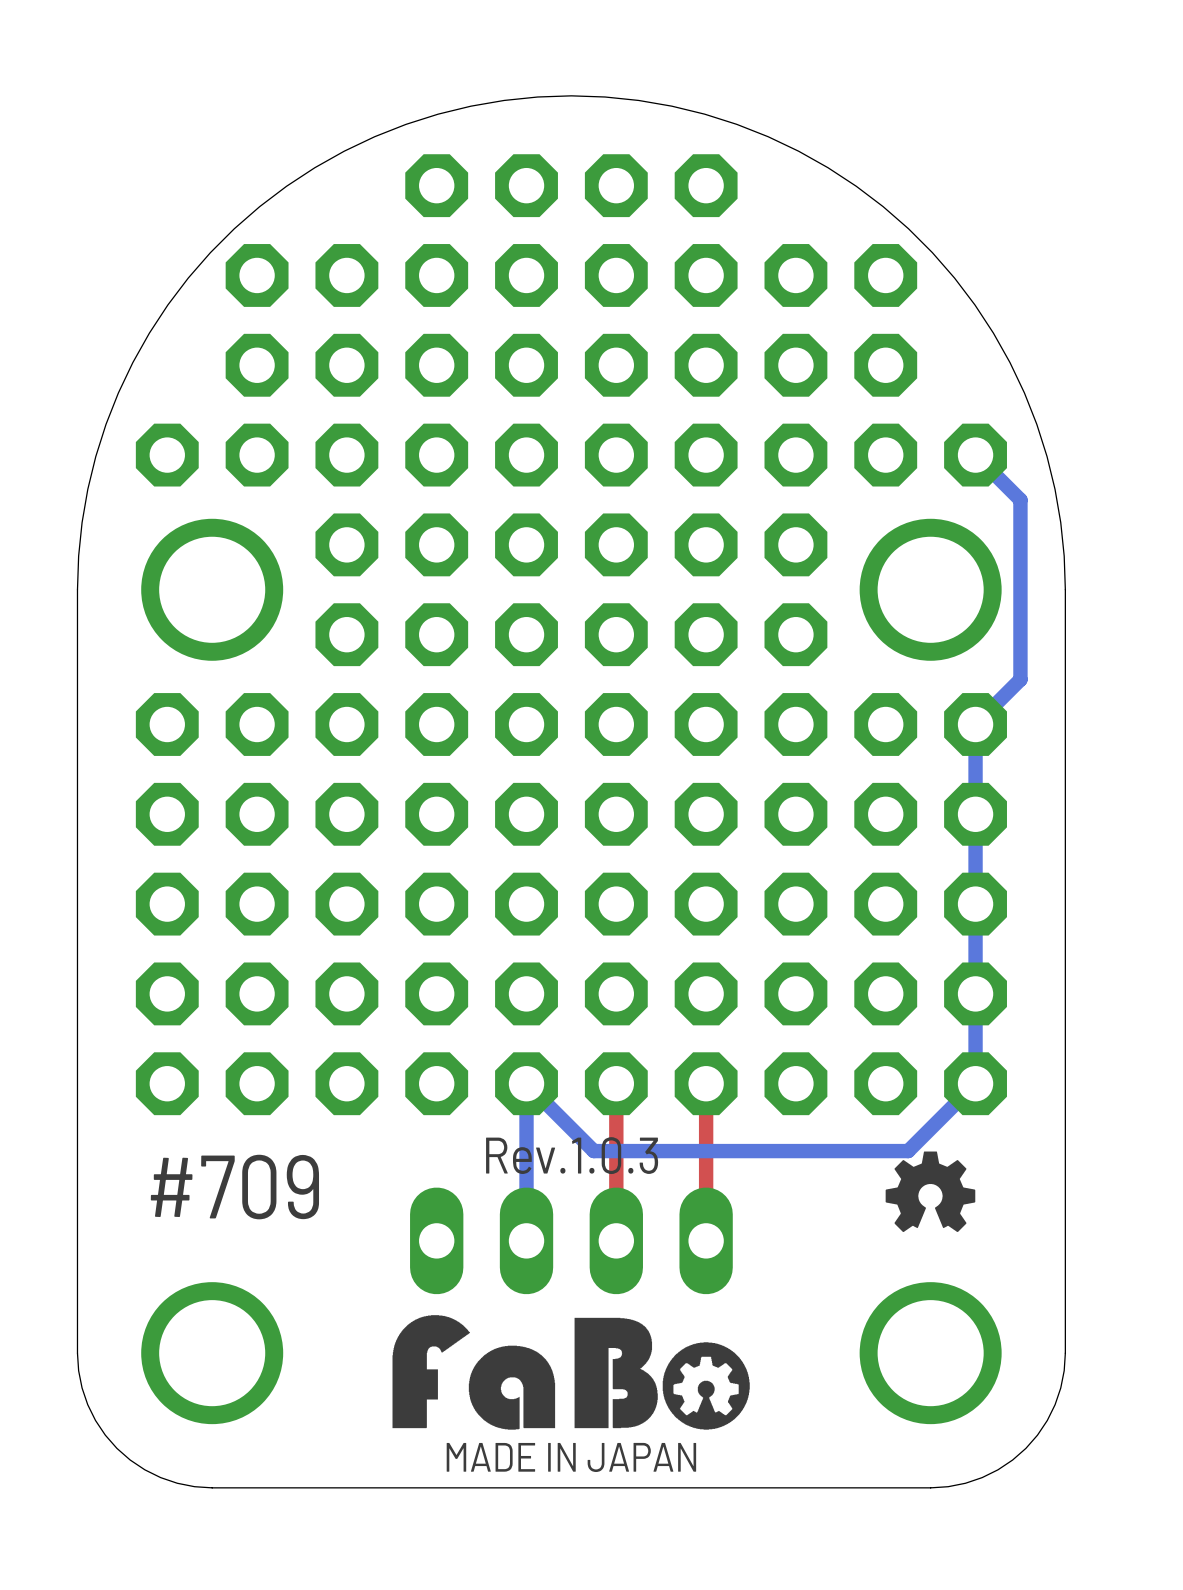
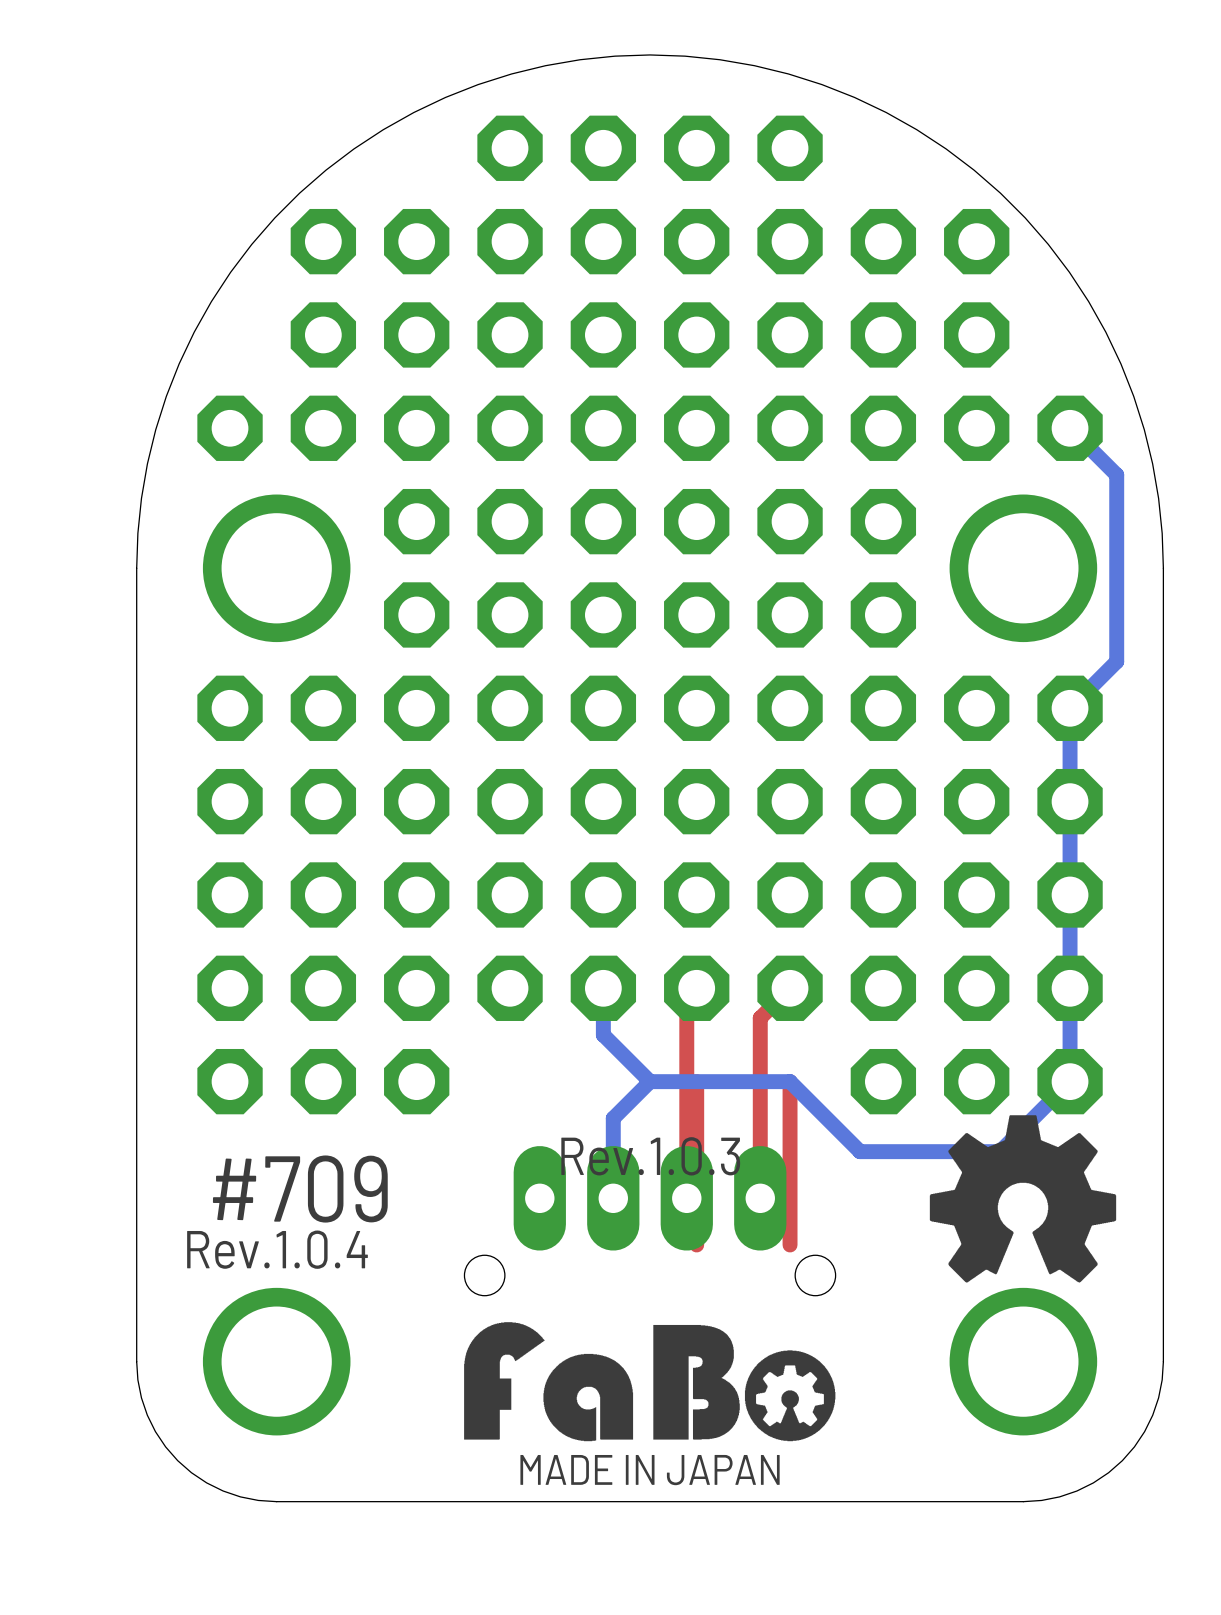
part footprint: [77, 95, 1066, 1488] -> [136, 54, 1164, 1502]
bottom track: none -> (603, 988) (603, 1034) (650, 1081)
part: none -> (603, 988)
top track: none -> (696, 988) (686, 998) (686, 1198)
part: none -> (696, 988)
top track: none -> (790, 988) (760, 1018) (760, 1198)
part: none -> (790, 988)
part: (436, 1083) -> none
part: (526, 1083) -> none
bottom track: none -> (650, 1081) (613, 1118) (613, 1198)
part: (616, 1083) -> none
part: (706, 1083) -> none
bottom track: (773, 1151) (593, 1151) (526, 1083) (526, 1240) -> (860, 1151) (790, 1081) (650, 1081)
drawing shape: [885, 1151, 976, 1232] -> [929, 1115, 1117, 1283]
text: none -> Rev.1.0.4 (277, 1249)

